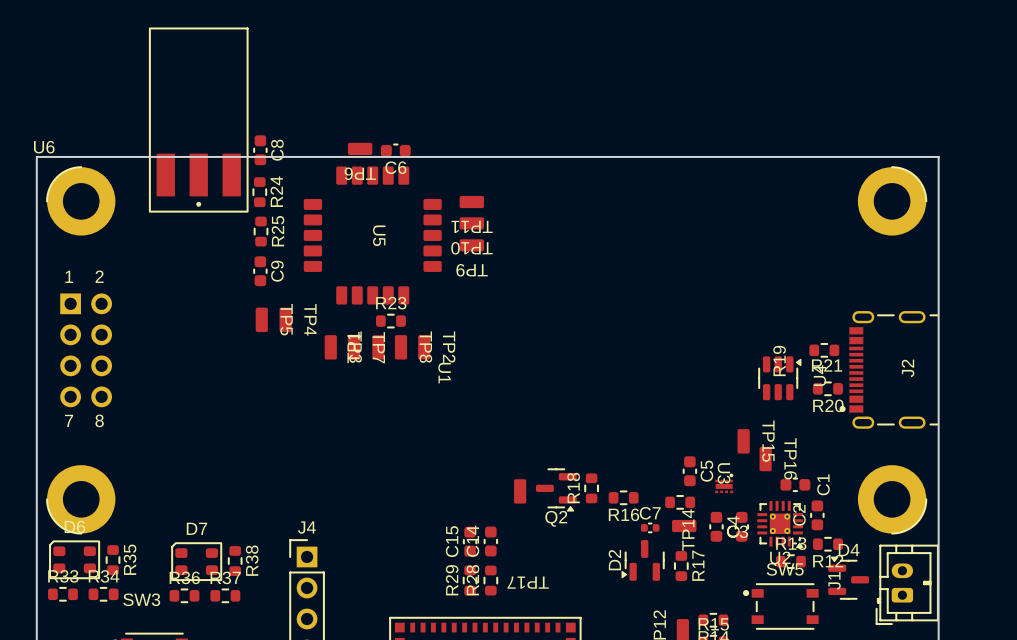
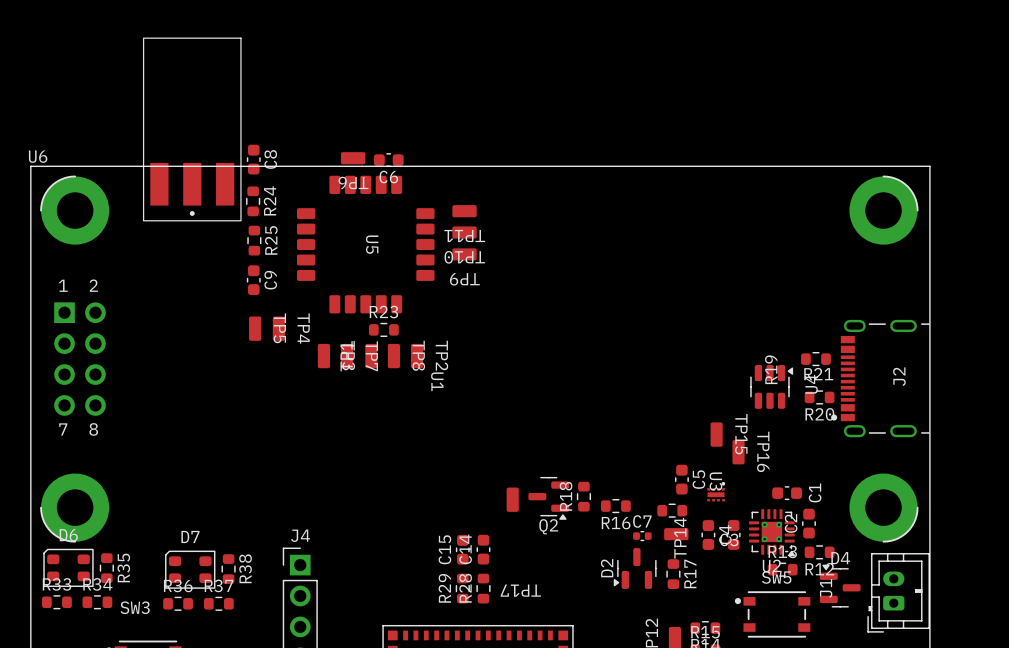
TP15 position: (743, 441) -> (716, 434)
TP16 position: (765, 459) -> (738, 452)

